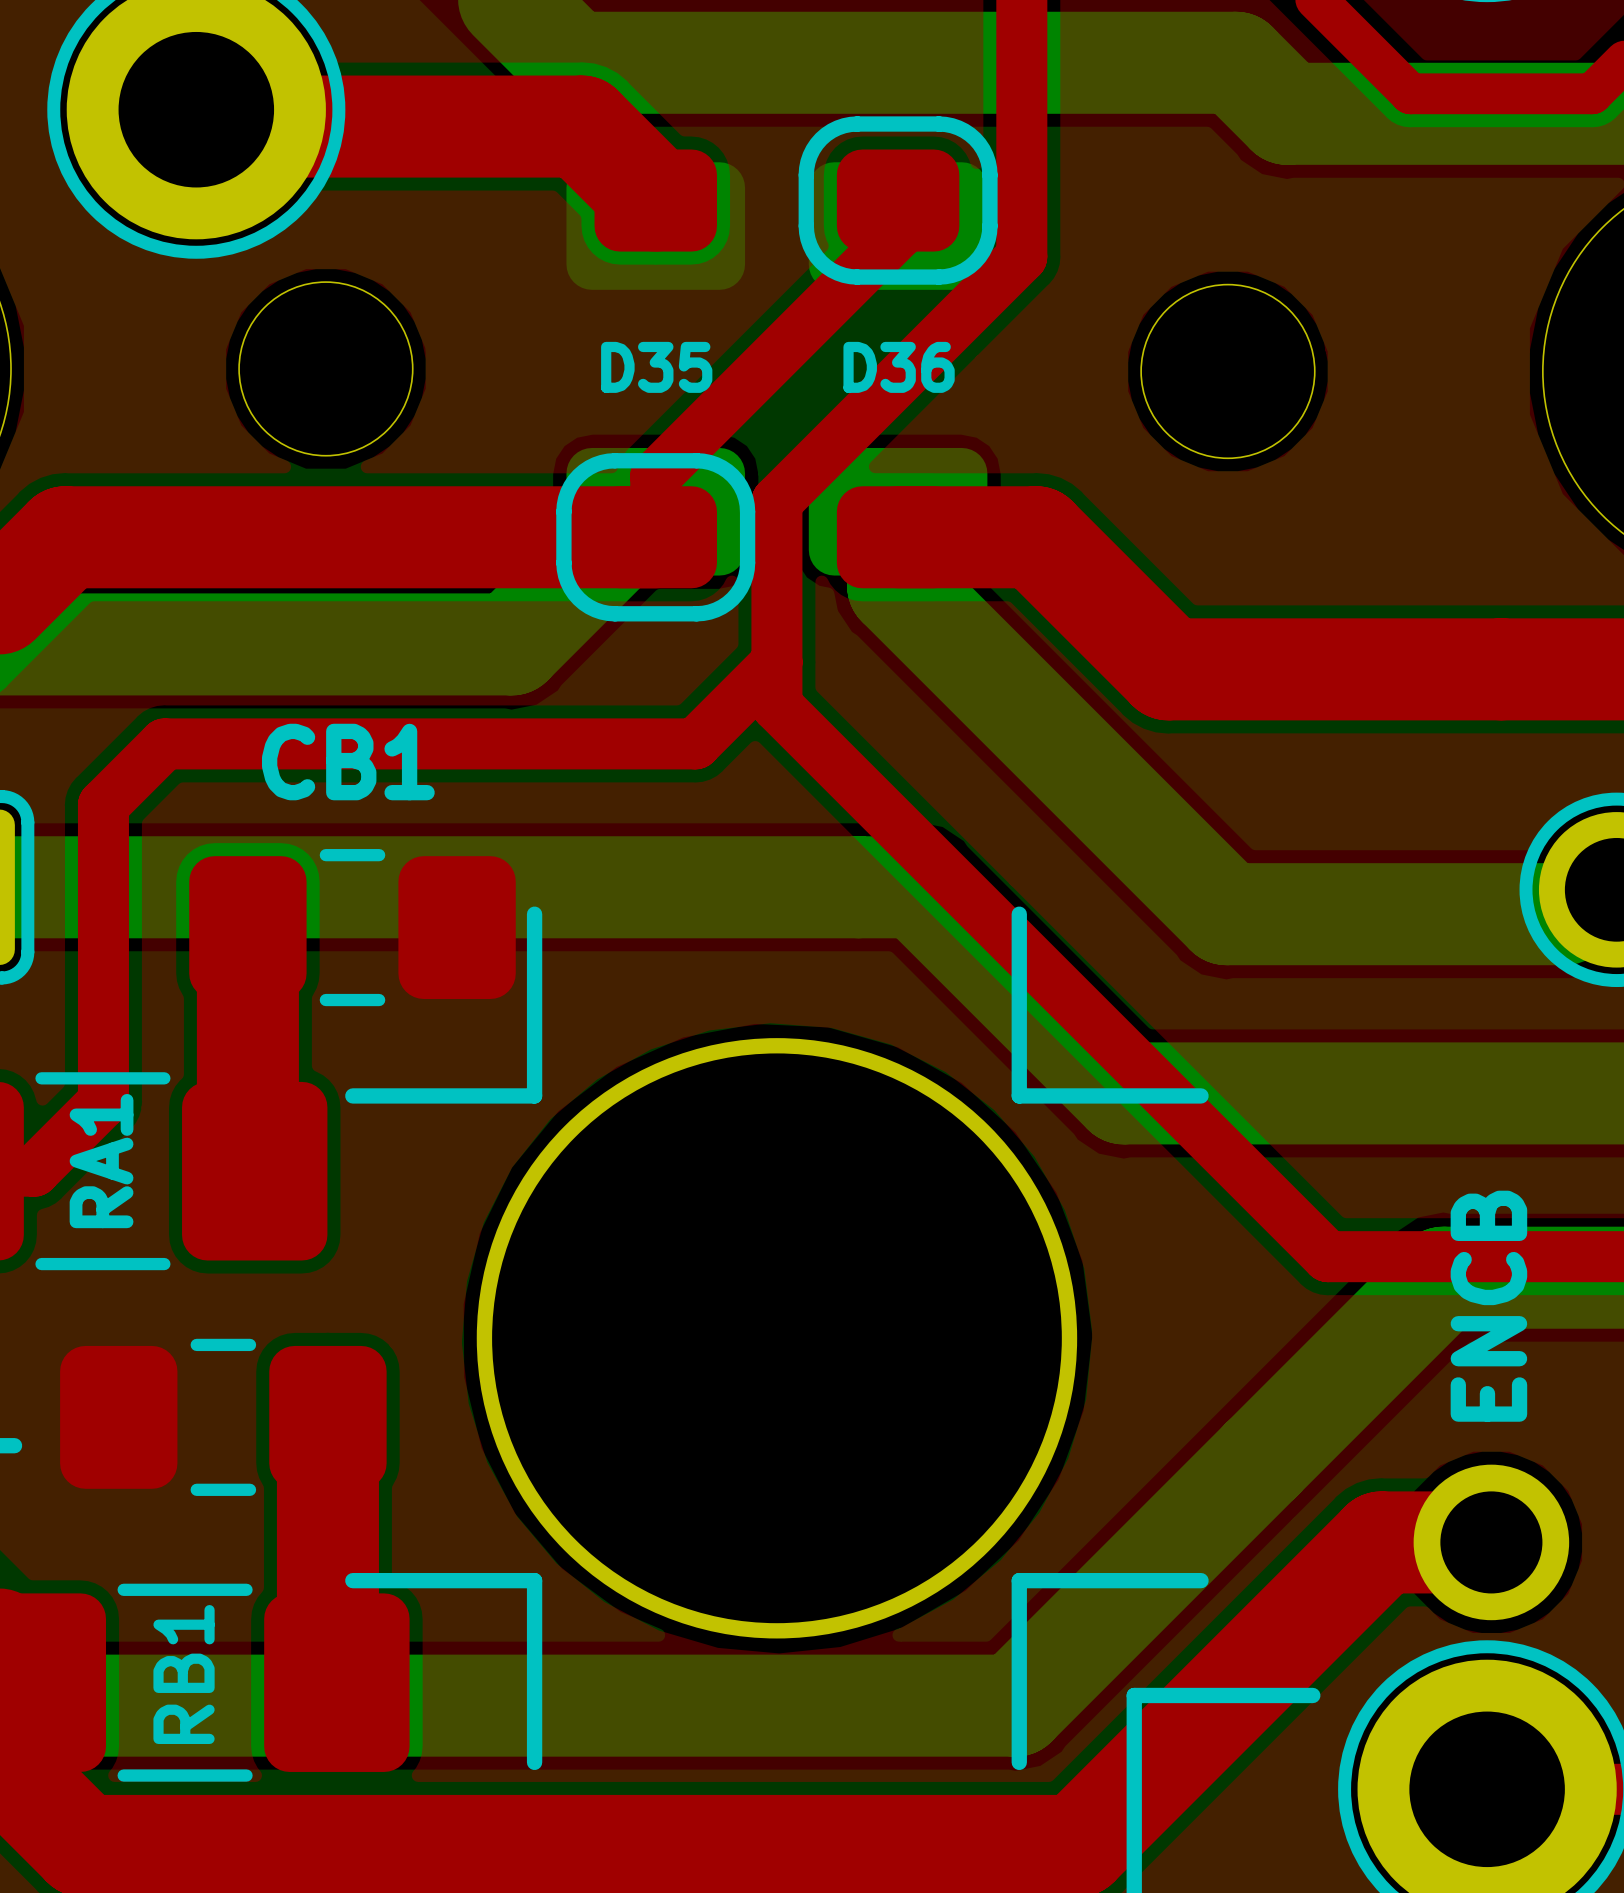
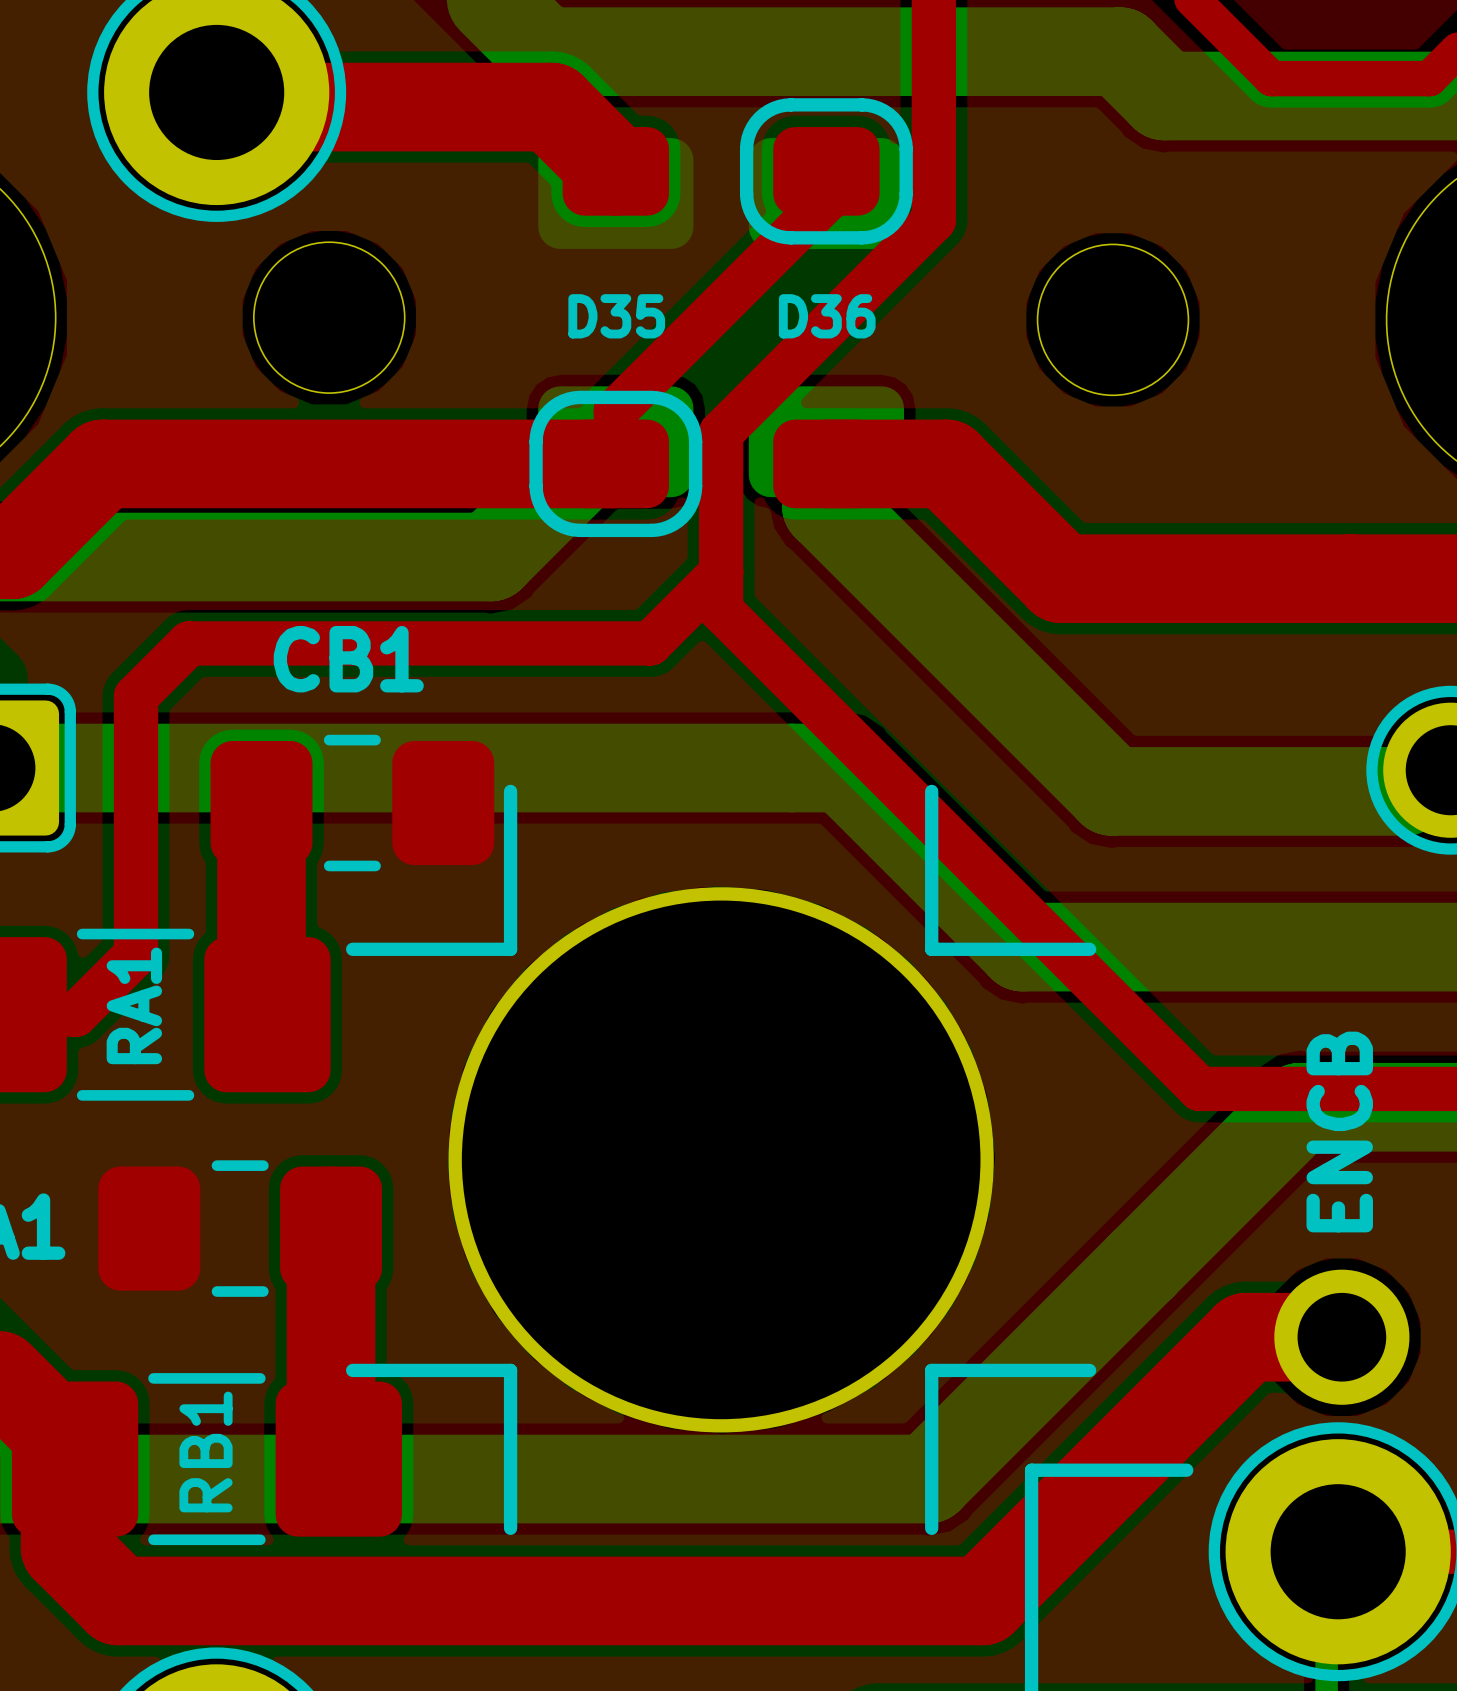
round board edge size: [476, 1038, 1078, 1639] -> [448, 887, 994, 1433]

